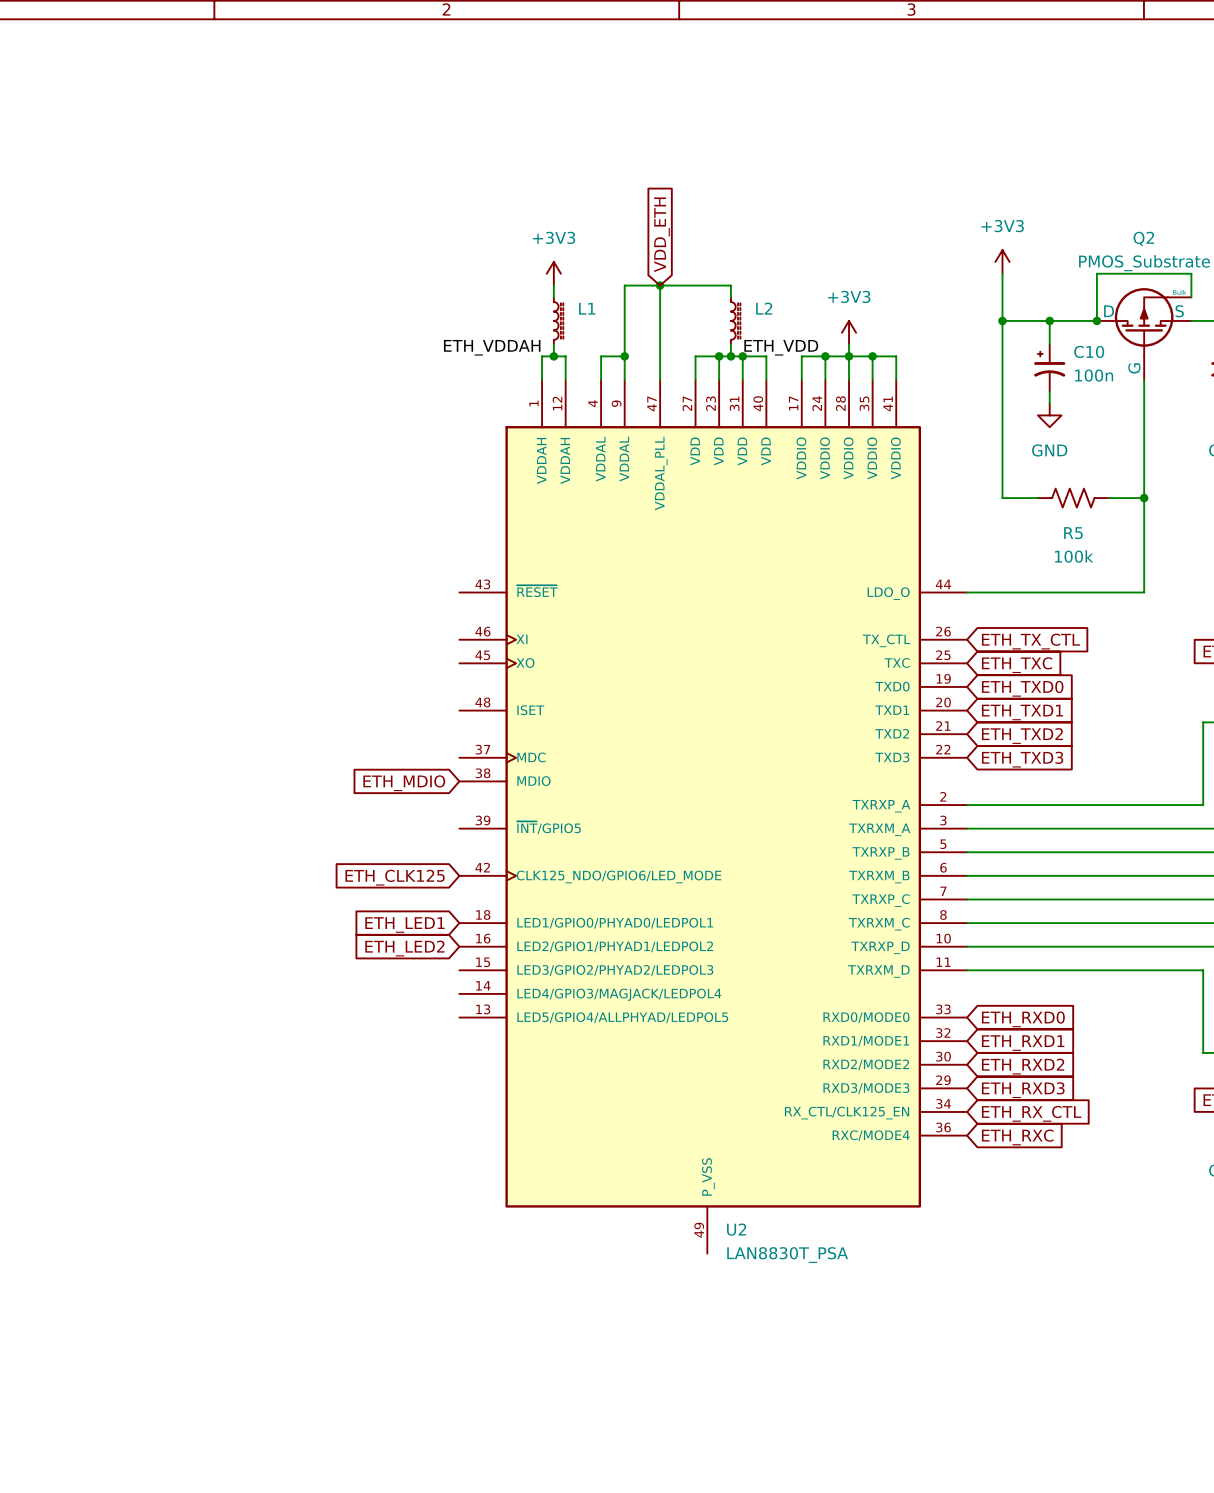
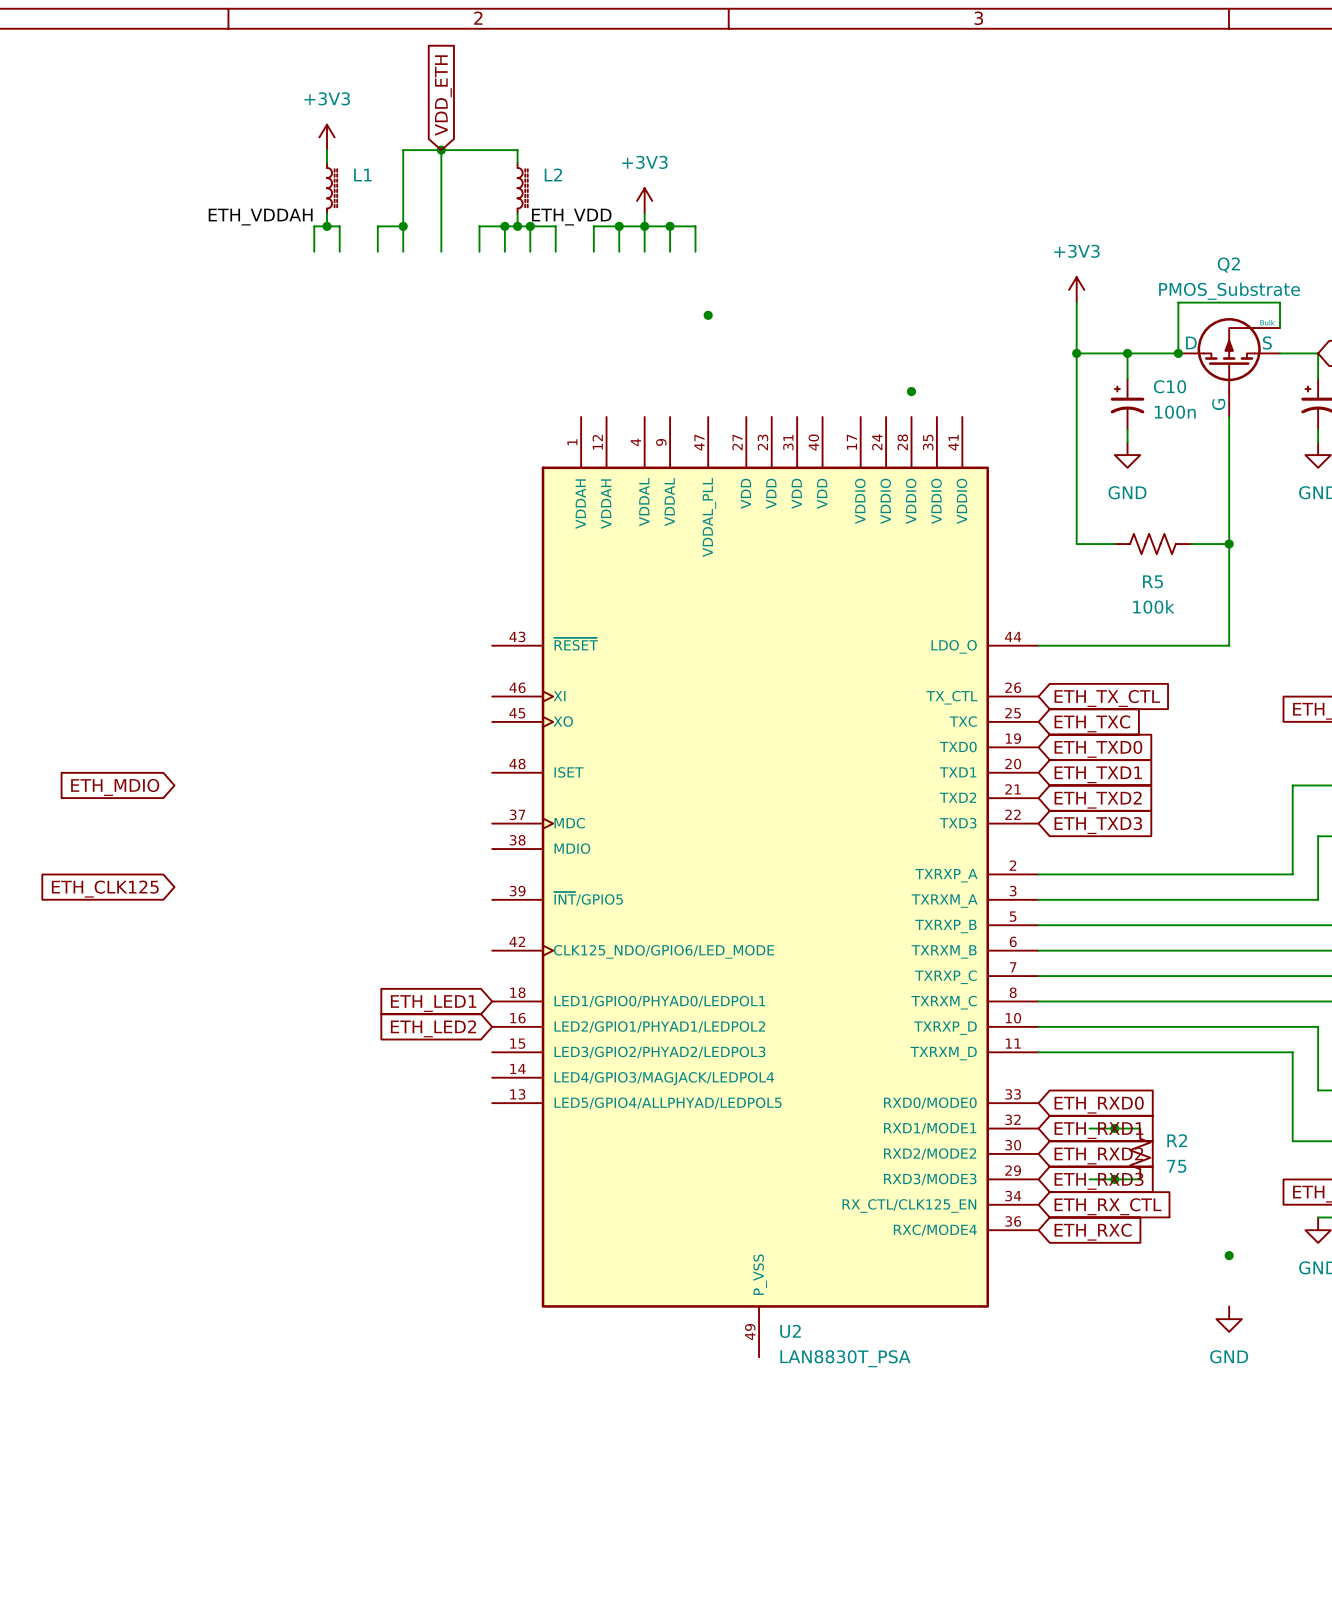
global label: none -> VDD_ETH (443, 95)
power symbol: none -> +3V3 (326, 137)
wire: none -> (326, 150) (326, 162)
wire: none -> (441, 150) (441, 251)
junction: none -> (441, 150)
wire: none -> (517, 162) (517, 150) (403, 150) (403, 251)
wire: none -> (326, 213) (326, 226)
wire: none -> (644, 213) (644, 251)
label: none -> ETH_VDDAH (260, 217)
label: none -> ETH_VDD (571, 217)
junction: none -> (326, 226)
wire: none -> (403, 226) (377, 226) (377, 251)
junction: none -> (403, 226)
wire: none -> (504, 226) (504, 251)
junction: none -> (504, 226)
junction: none -> (517, 226)
wire: none -> (530, 226) (530, 251)
junction: none -> (530, 226)
junction: none -> (619, 226)
junction: none -> (644, 226)
junction: none -> (670, 226)
wire: none -> (314, 251) (314, 226) (339, 226) (339, 251)
wire: none -> (479, 251) (479, 226) (555, 226) (555, 251)
wire: none -> (593, 251) (593, 226) (695, 226) (695, 251)
global label: VDD_ETH (662, 234) -> none
power symbol position: +3V3 (553, 273) -> +3V3 (644, 200)
wire: (553, 285) (553, 297) -> (517, 213) (517, 226)
wire: (660, 285) (660, 380) -> none
wire: (730, 297) (730, 285) (624, 285) (624, 380) -> none
L1 position: (558, 320) -> (332, 188)
L2 position: (735, 320) -> (522, 188)
power symbol: +3V3 (849, 332) -> none
wire: (553, 344) (553, 356) -> none
wire: (730, 344) (730, 356) -> none
wire: (849, 344) (849, 380) -> none
label: ETH_VDDAH (492, 347) -> none
label: ETH_VDD (781, 347) -> none
junction: (553, 356) -> none
wire: (624, 356) (601, 356) (601, 380) -> none
junction: (624, 356) -> none
wire: (719, 356) (719, 380) -> (670, 226) (670, 251)
junction: (719, 356) -> none
junction: (730, 356) -> none
wire: (742, 356) (742, 380) -> (619, 226) (619, 251)
junction: (742, 356) -> none
wire: (825, 356) (825, 380) -> none
junction: (825, 356) -> none
wire: (872, 356) (872, 380) -> none
junction: (872, 356) -> none
wire: (542, 380) (542, 356) (565, 356) (565, 380) -> none
wire: (695, 380) (695, 356) (766, 356) (766, 380) -> none
wire: (801, 380) (801, 356) (896, 356) (896, 380) -> none
global label: none -> ETH_MDIO (115, 787)
global label: ETH_MDIO (404, 783) -> none
global label: none -> ETH_CLK125 (105, 889)
global label: ETH_CLK125 (395, 877) -> none
wire: none -> (1089, 1128) (1140, 1128)
junction: none -> (1114, 1128)
R2: none -> 75 (1140, 1153)
wire: none -> (1089, 1179) (1140, 1179)
junction: none -> (1114, 1179)
junction: none -> (1229, 1255)
power symbol: none -> GND (1229, 1319)

